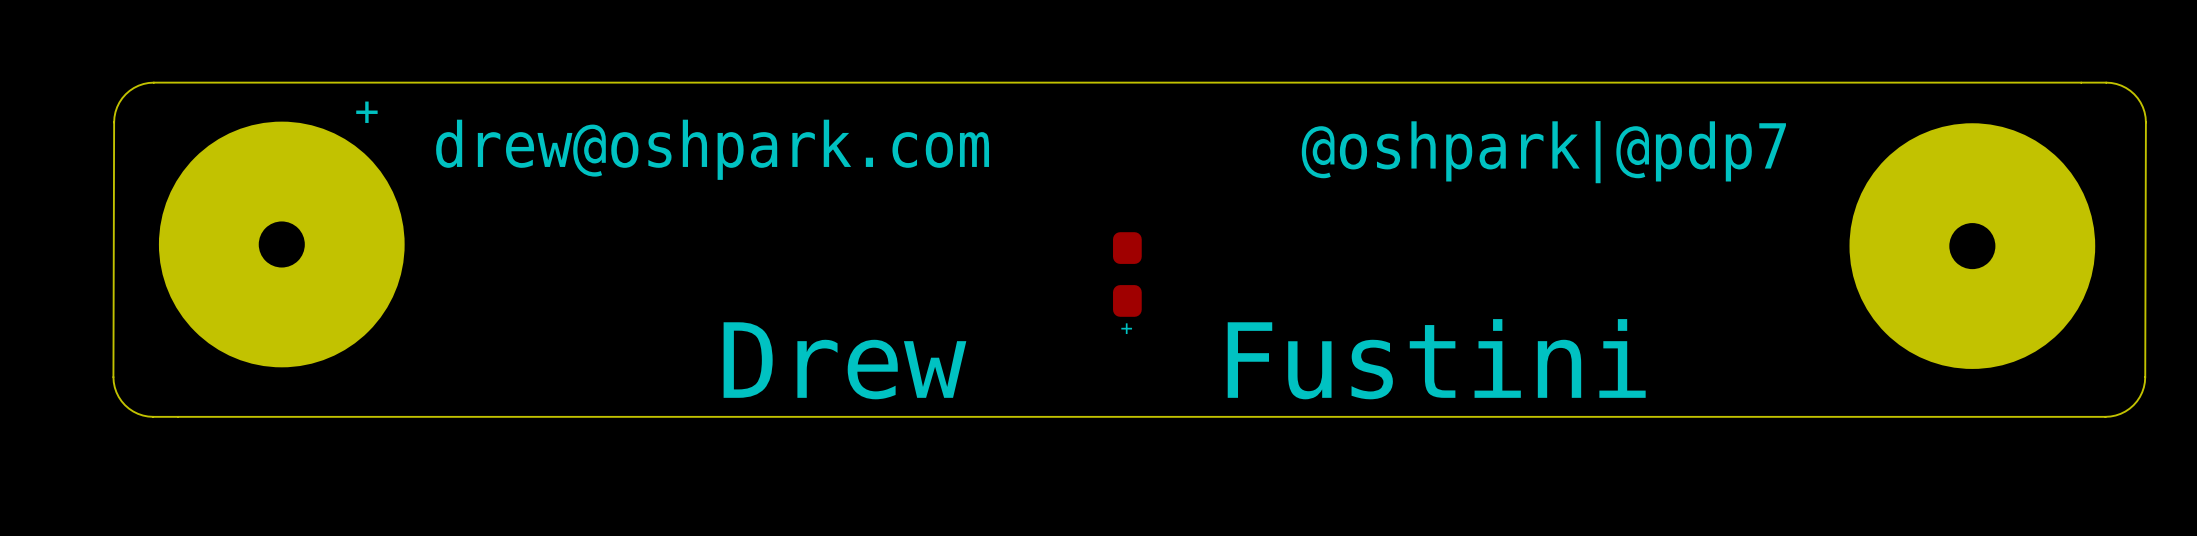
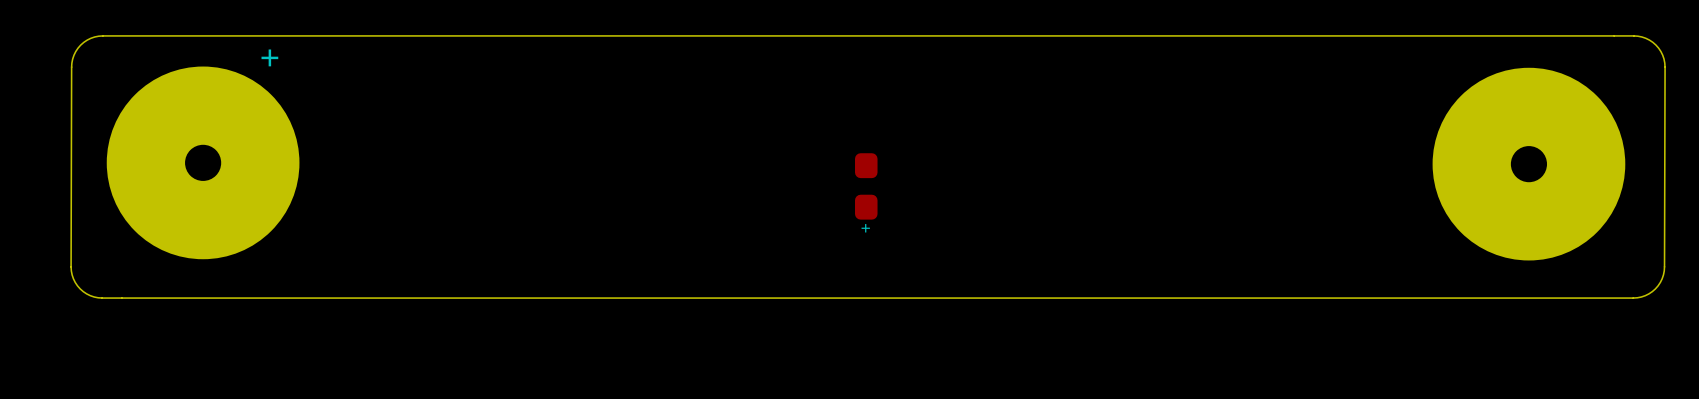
text: drew@oshpark.com (712, 149) -> none
text: @oshpark|@pdp7 (1543, 152) -> none
text: Drew Fustini (1184, 359) -> none

